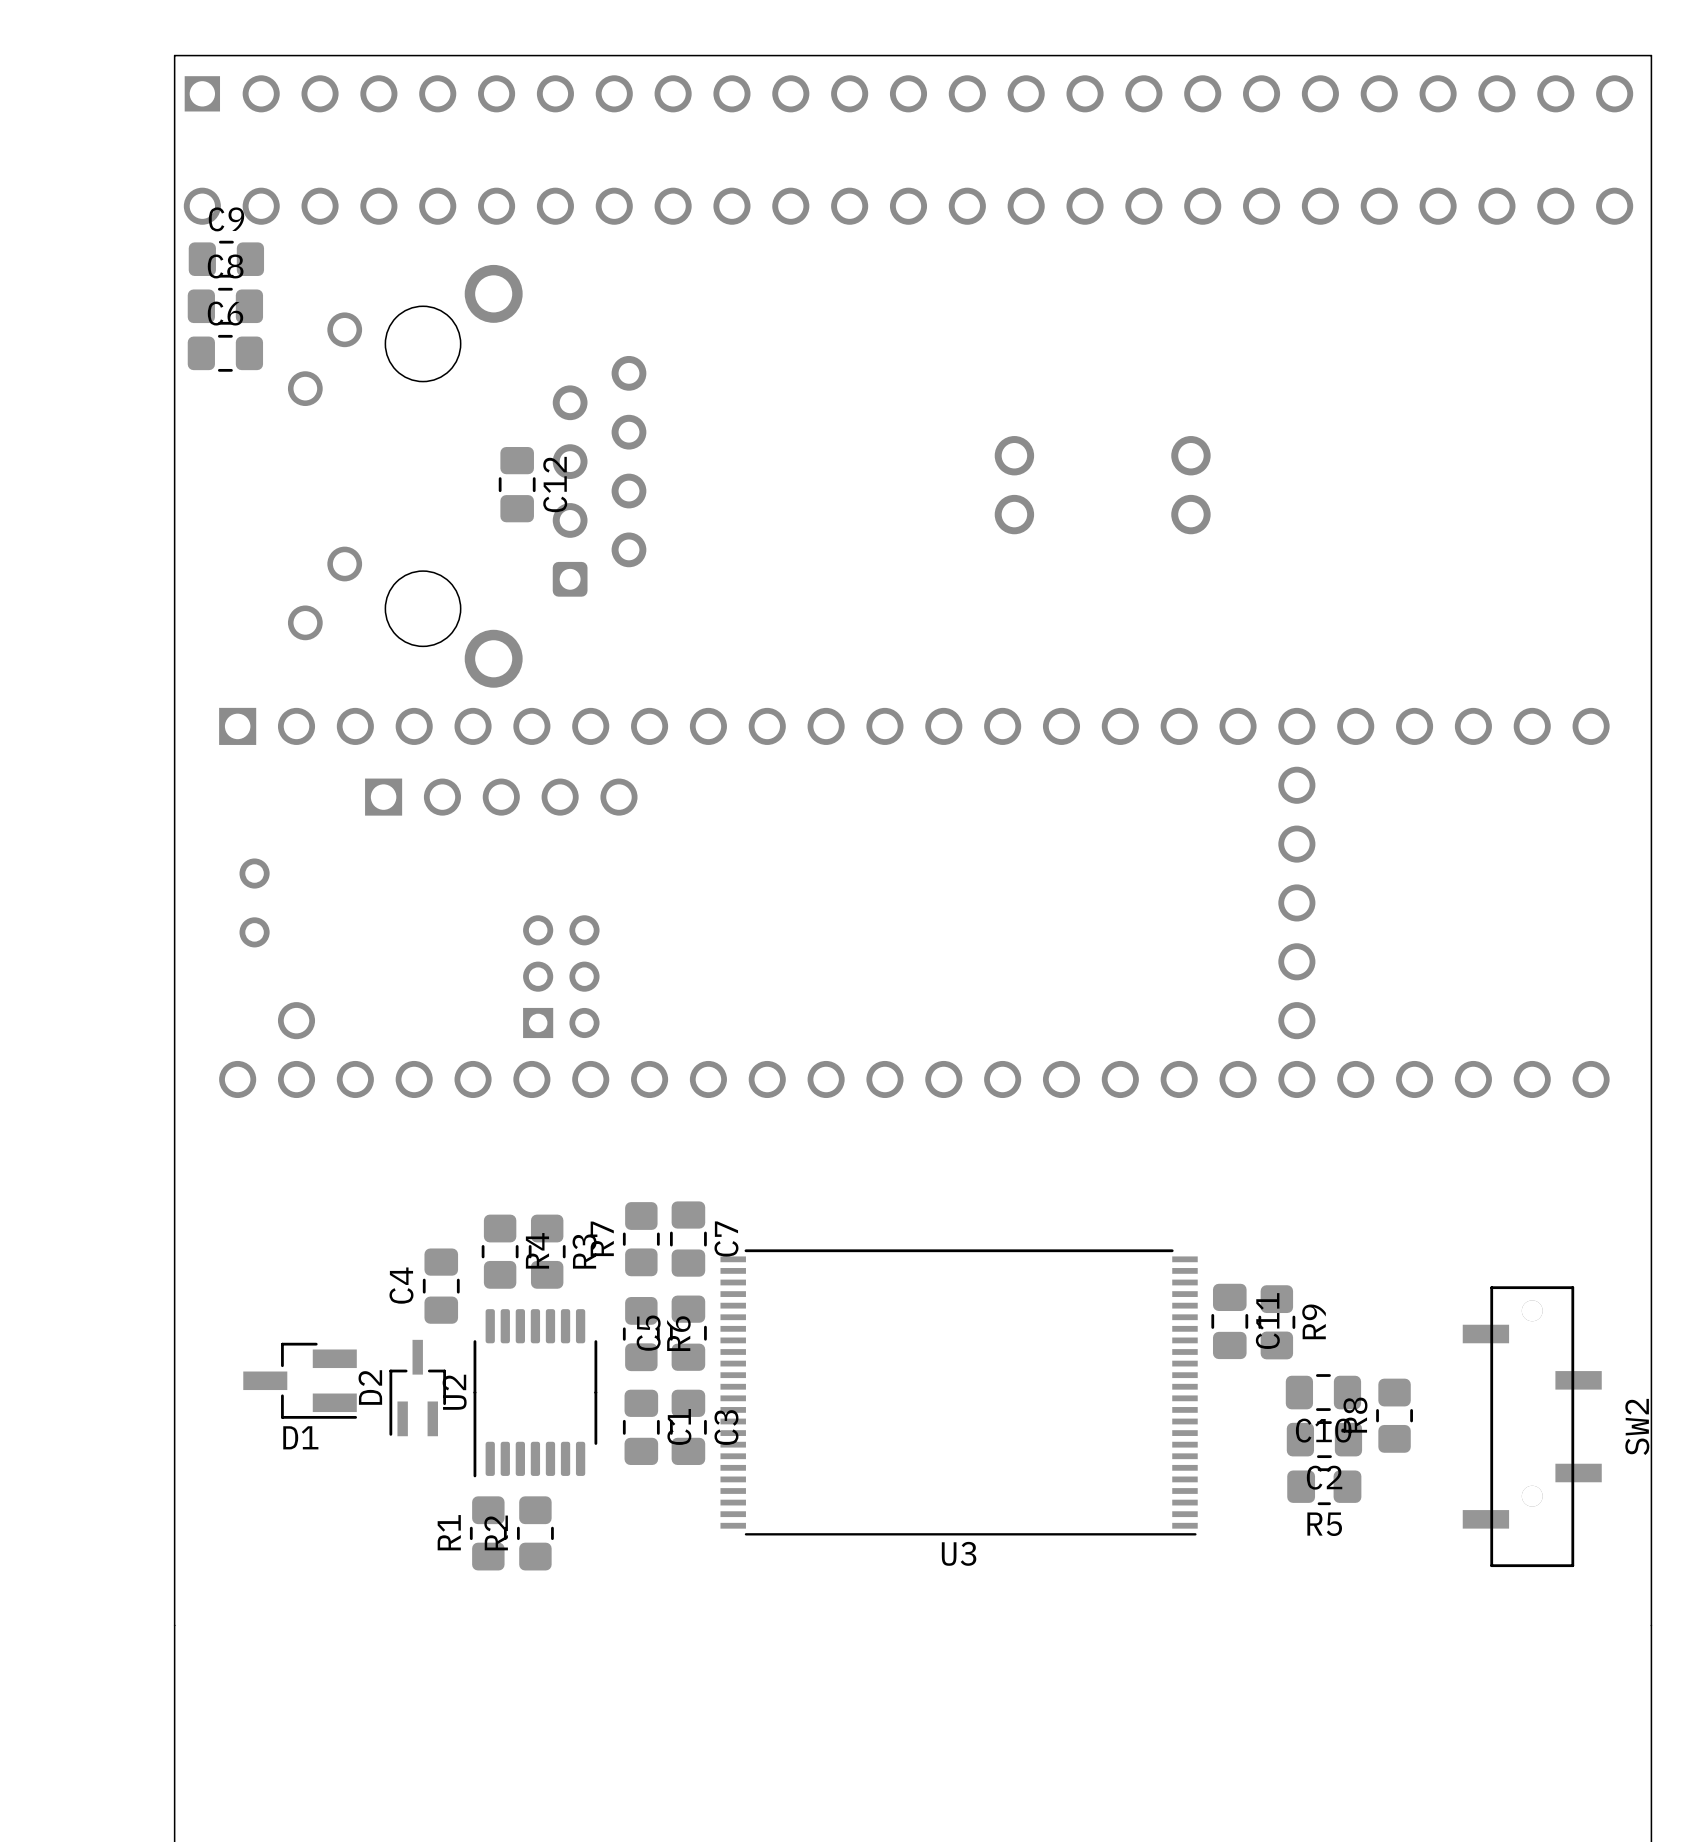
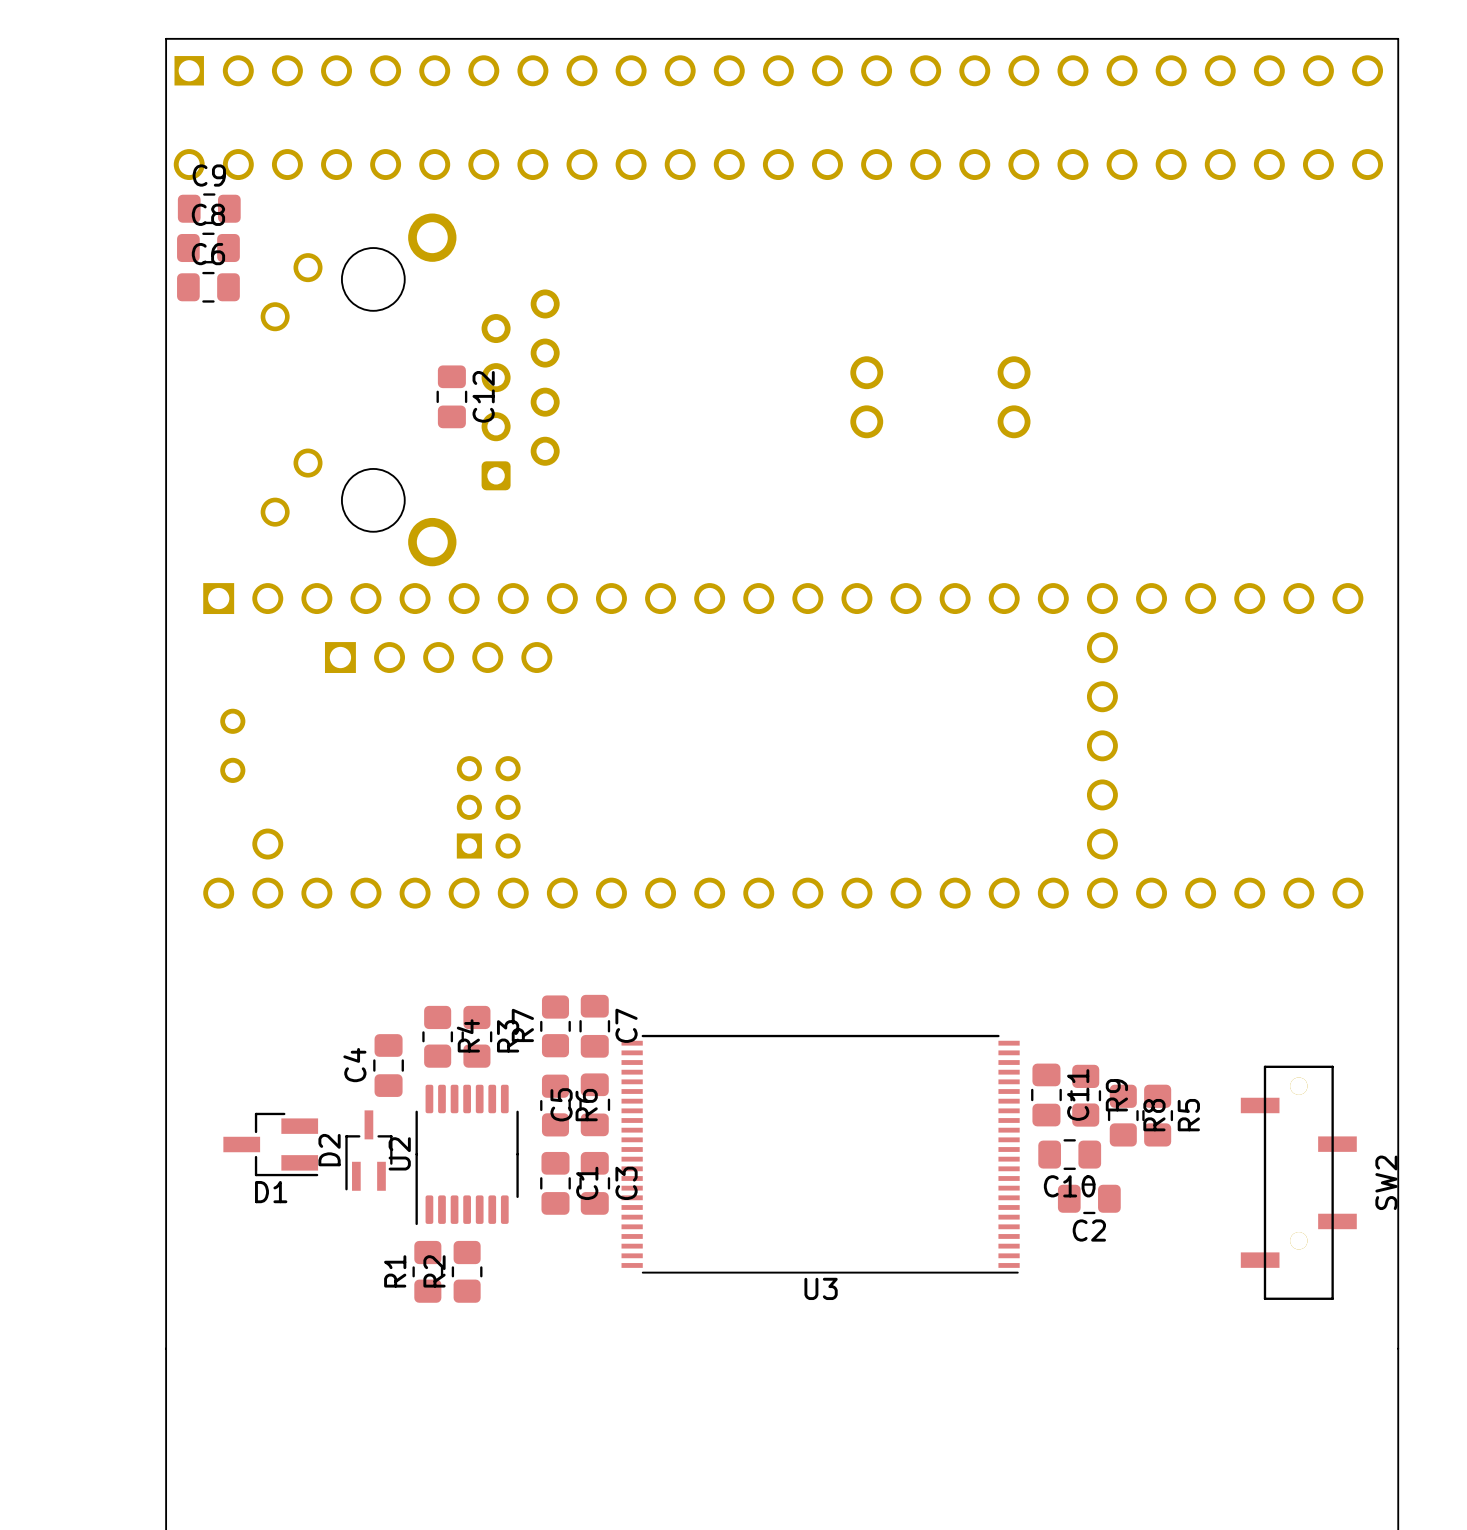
C10 position: (1323, 1392) -> (1069, 1154)
R8 name position: R8 (1355, 1415) -> R8 (1154, 1115)
R8 position: (1394, 1415) -> (1123, 1115)
C2 position: (1324, 1439) -> (1089, 1198)
R5 rotation: 0° (1324, 1486) -> 90° clockwise (1157, 1115)
R5 position: (1324, 1486) -> (1157, 1115)
R5 name position: R5 (1324, 1524) -> R5 (1188, 1115)

